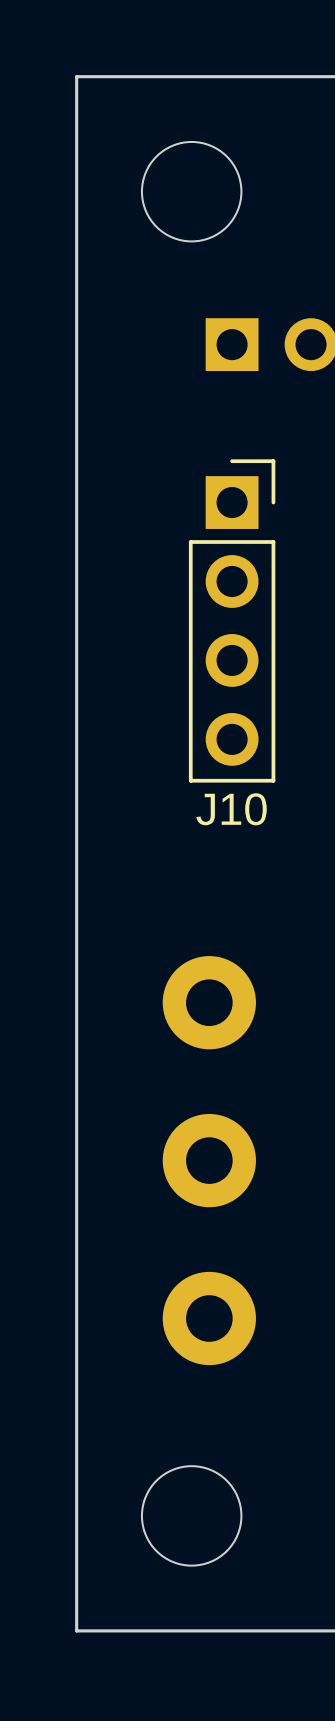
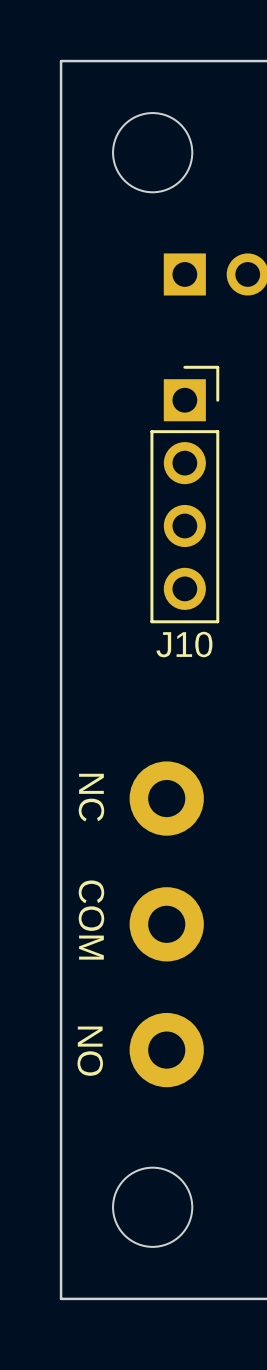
text: none -> NC (91, 797)
text: none -> COM (91, 920)
text: none -> NO (90, 1051)

